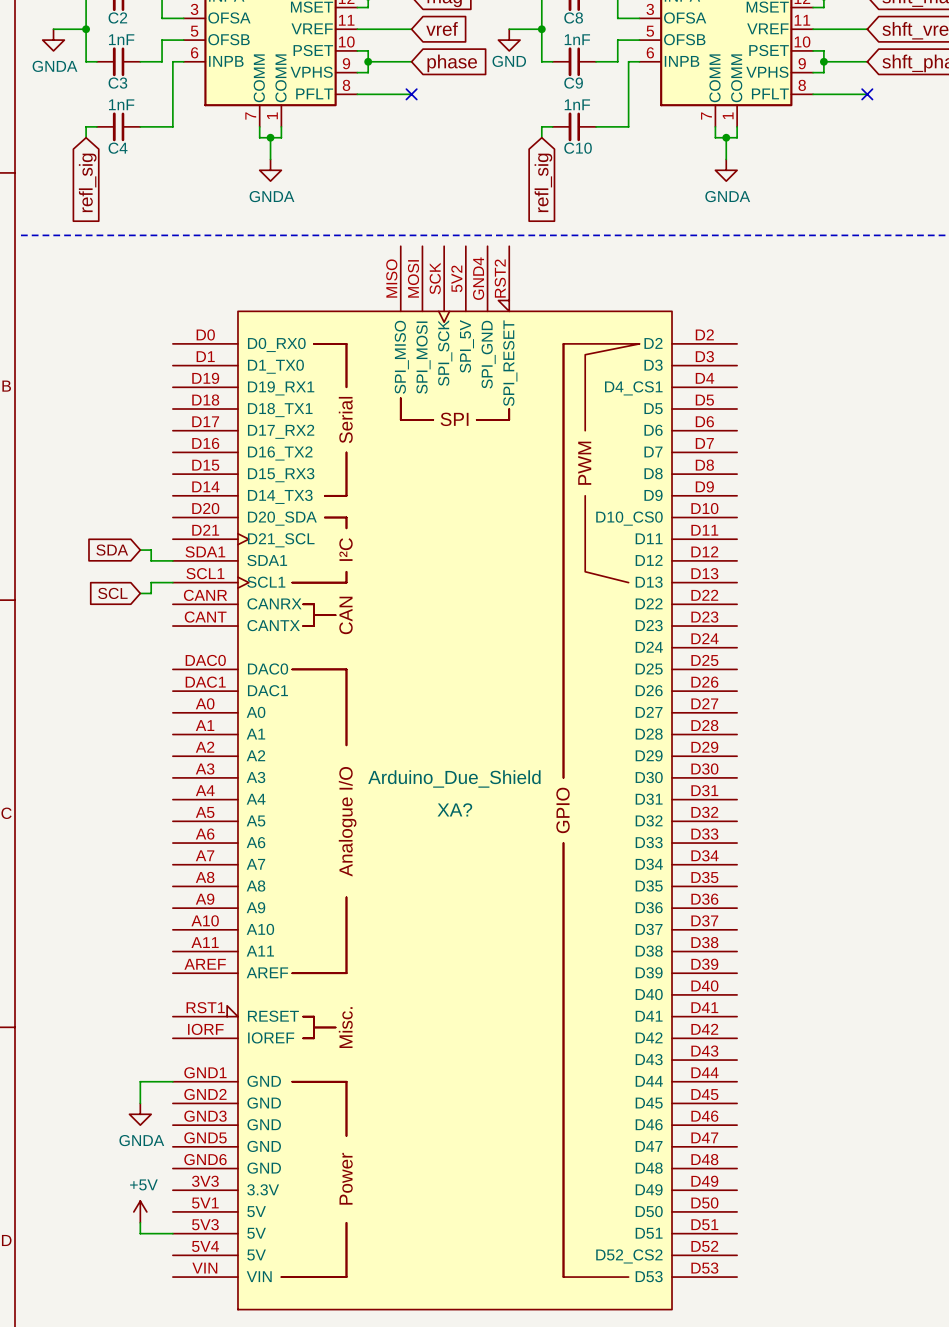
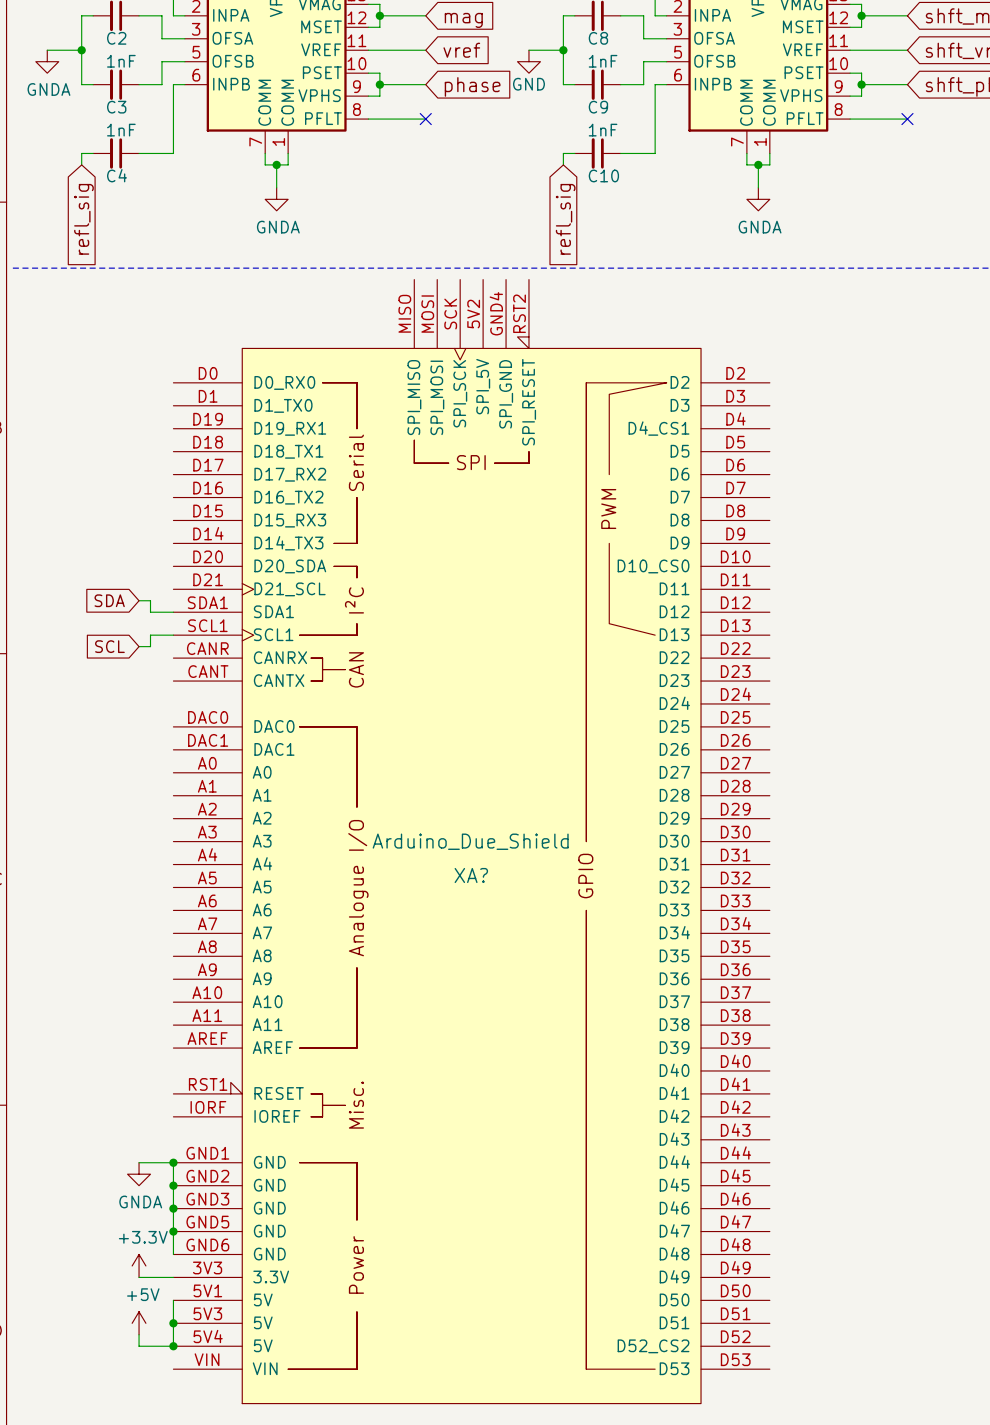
wire: none -> (173, 1162) (173, 1254)
junction: none -> (173, 1162)
junction: none -> (173, 1185)
power symbol position: GNDA (140, 1114) -> GNDA (139, 1174)
junction: none -> (173, 1208)
junction: none -> (173, 1231)
power symbol: none -> +3.3V (139, 1265)
wire: none -> (139, 1277) (173, 1277)
power symbol position: +5V (140, 1211) -> +5V (139, 1323)
wire: none -> (173, 1300) (173, 1346) (139, 1346) (139, 1334)
wire: (140, 1222) (140, 1233) (172, 1233) -> none
junction: none -> (173, 1323)
junction: none -> (173, 1346)

